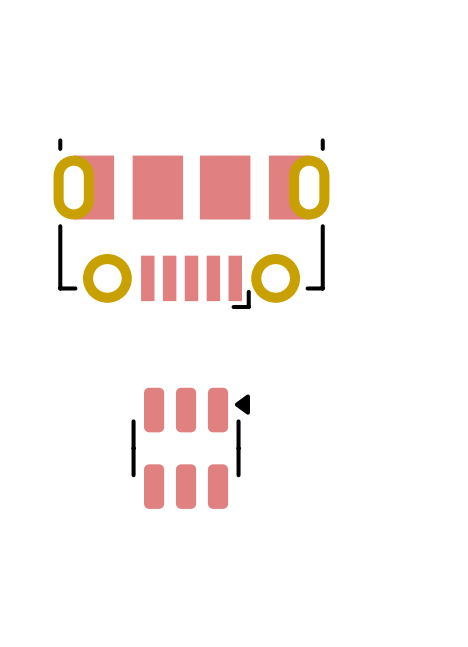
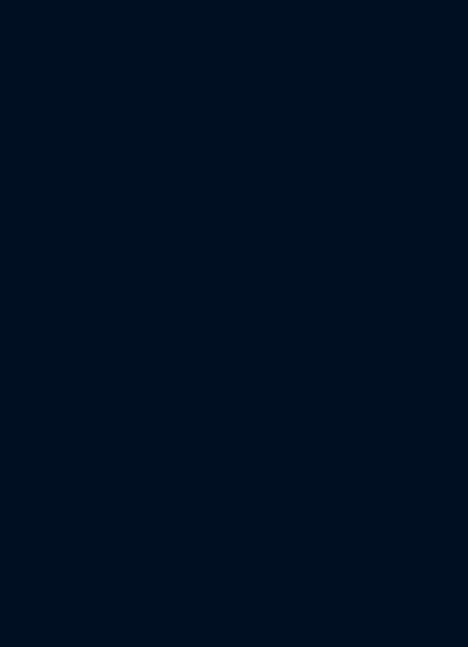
part: (191, 223) -> none
part: (190, 448) -> none

